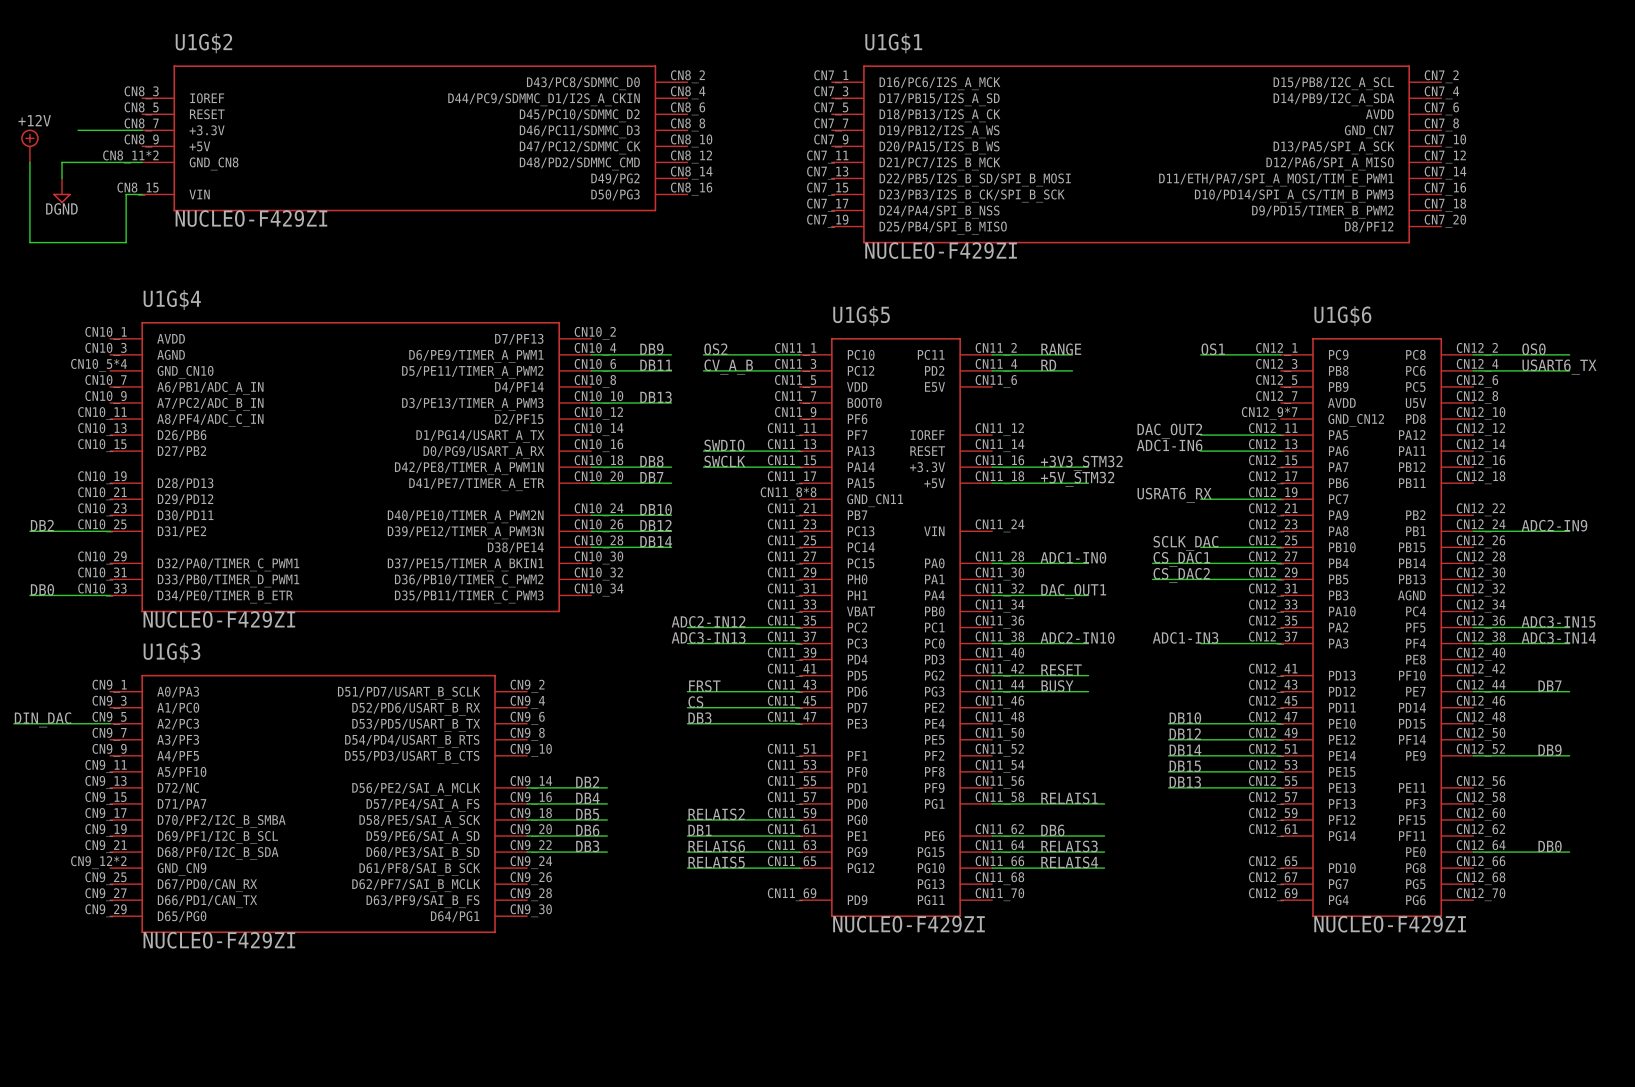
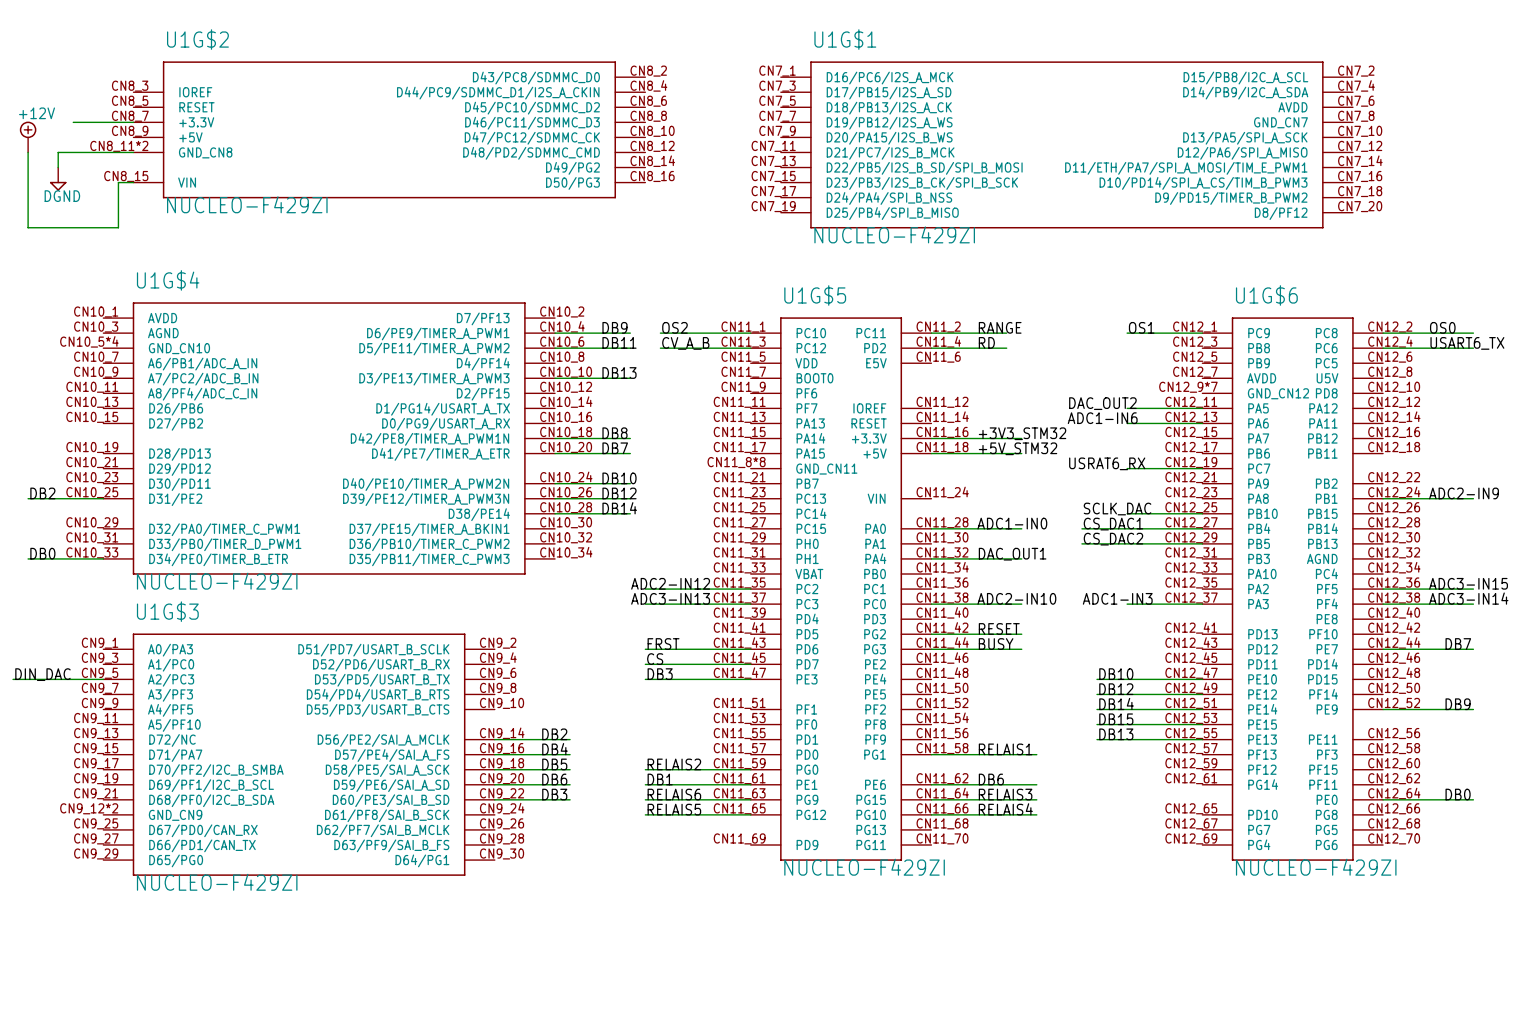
label: SWDIO (724, 445) -> none
wire: (703, 451) (799, 451) -> none
label: SWCLK (724, 461) -> none
wire: (703, 467) (799, 467) -> none

